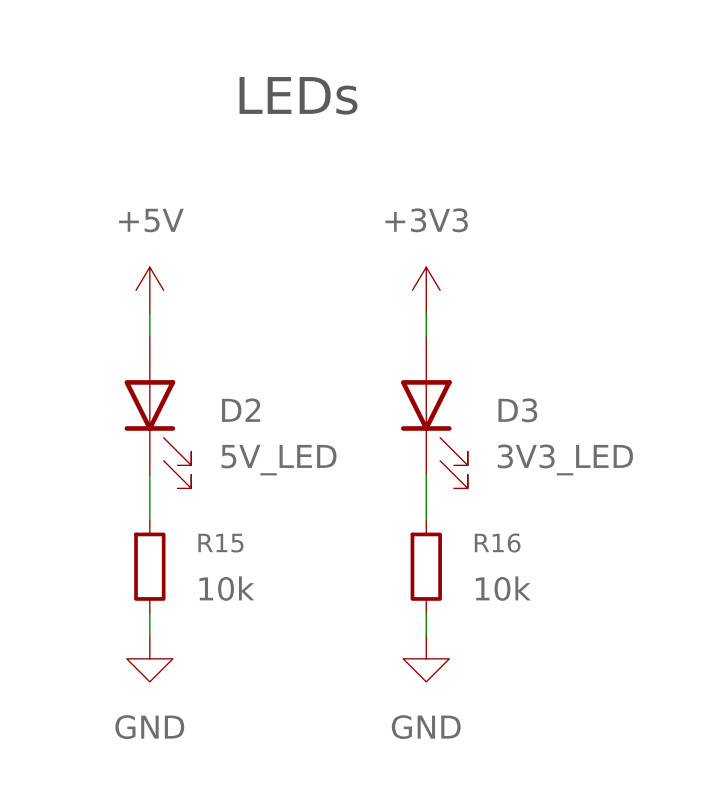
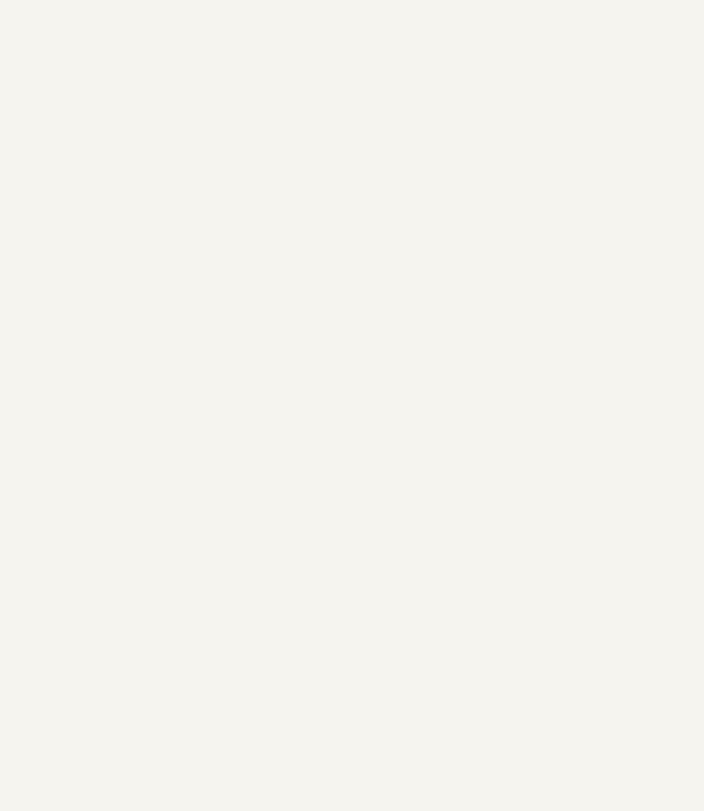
text: LEDs (298, 95) -> none
power symbol: +5V (149, 290) -> none
power symbol: +3V3 (426, 290) -> none
wire: (149, 313) (149, 336) -> none
wire: (426, 313) (426, 336) -> none
D2: 5V_LED (157, 412) -> none
D3: 3V3_LED (434, 412) -> none
wire: (149, 474) (149, 520) -> none
wire: (426, 474) (426, 520) -> none
R15: 10k (149, 566) -> none
R16: 10k (426, 566) -> none
wire: (149, 612) (149, 635) -> none
wire: (426, 612) (426, 635) -> none
power symbol: GND (149, 658) -> none
power symbol: GND (426, 658) -> none

